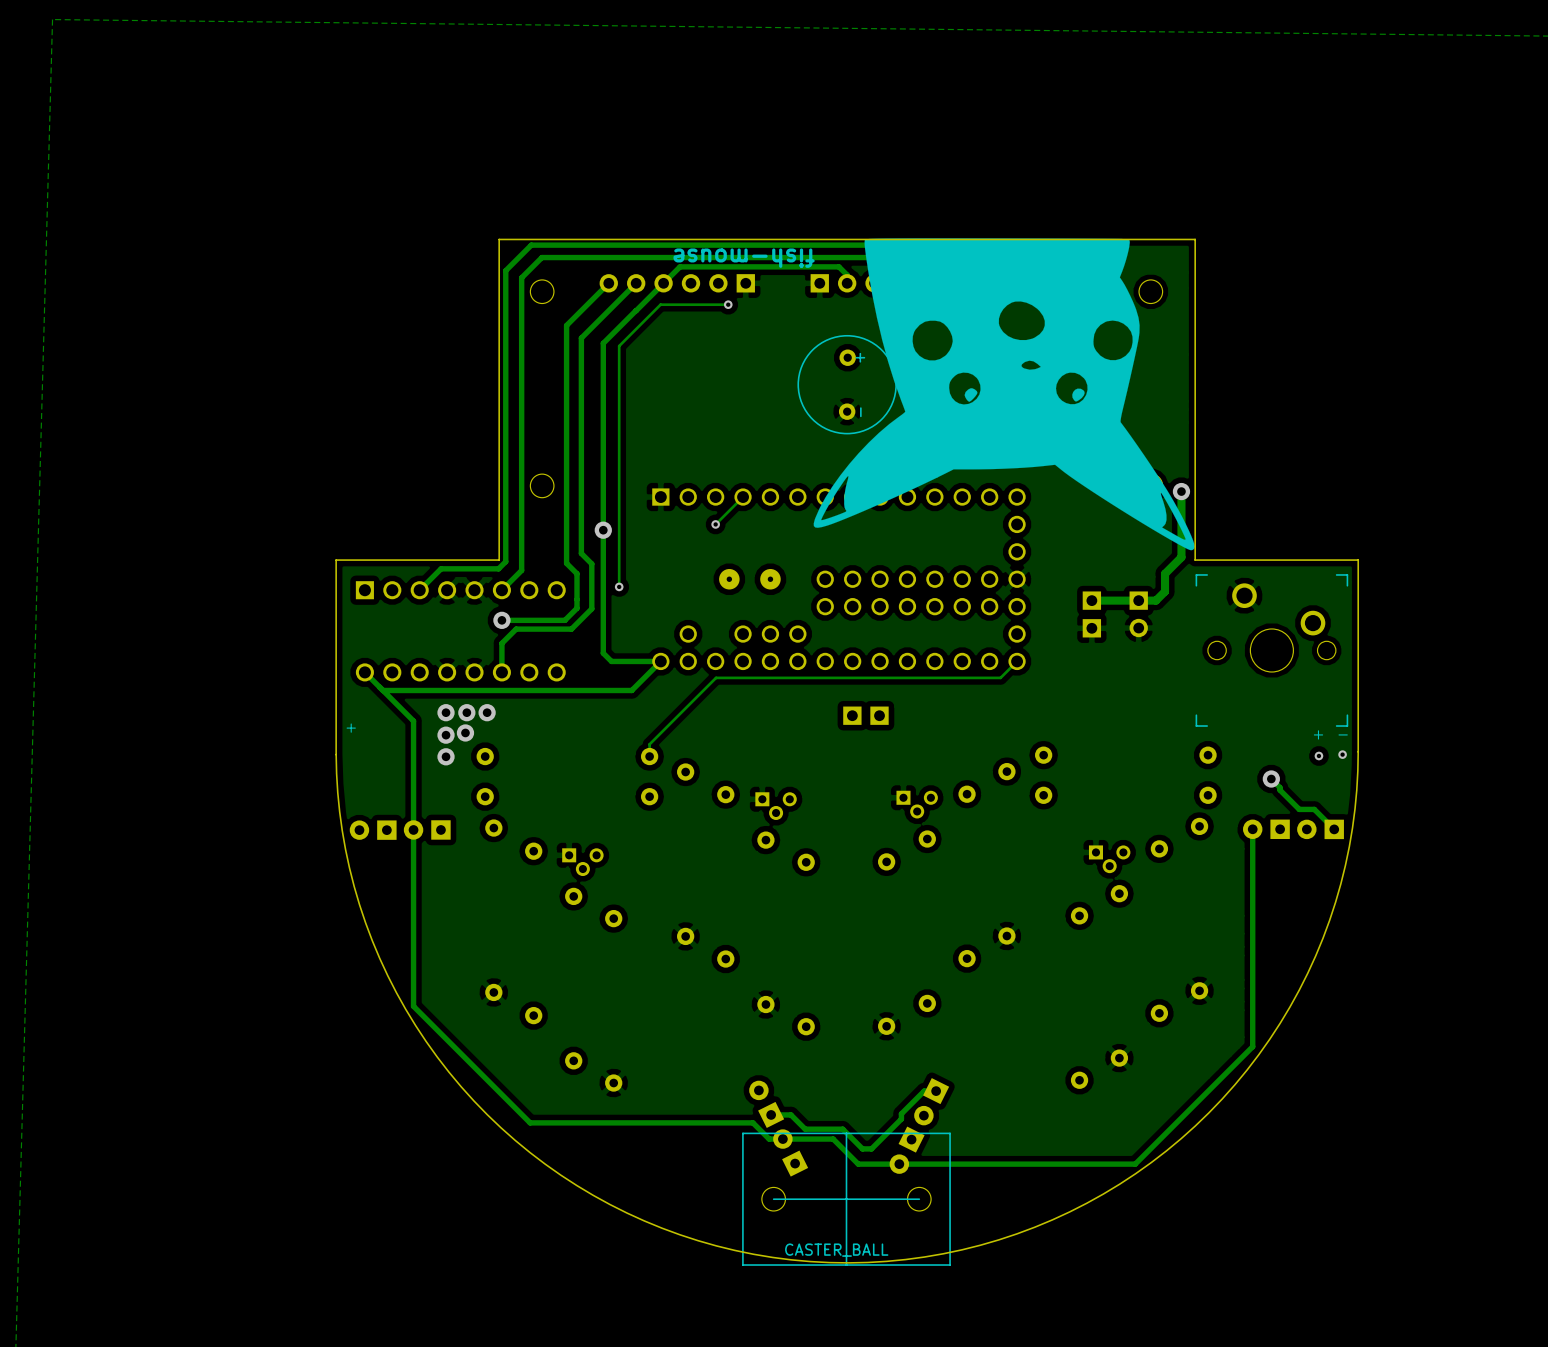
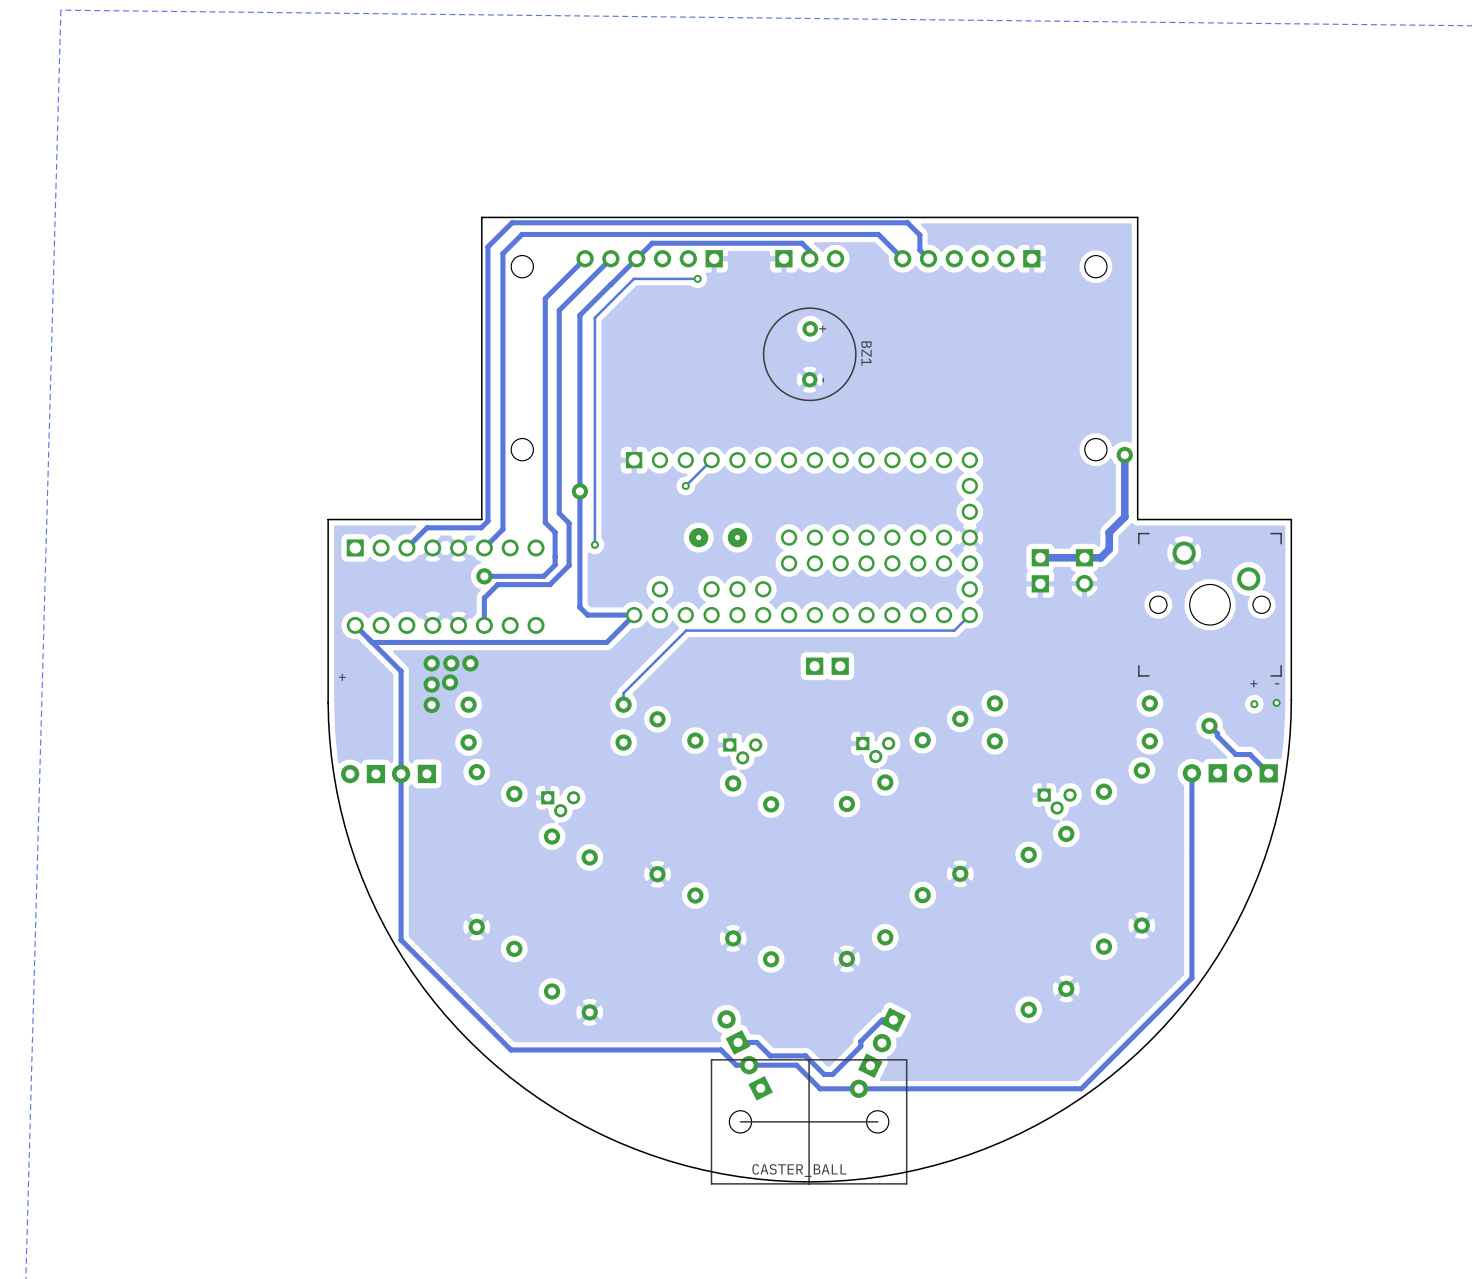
drawing: [813, 238, 1195, 551] -> none
text: fish-mouse (744, 258) -> none

